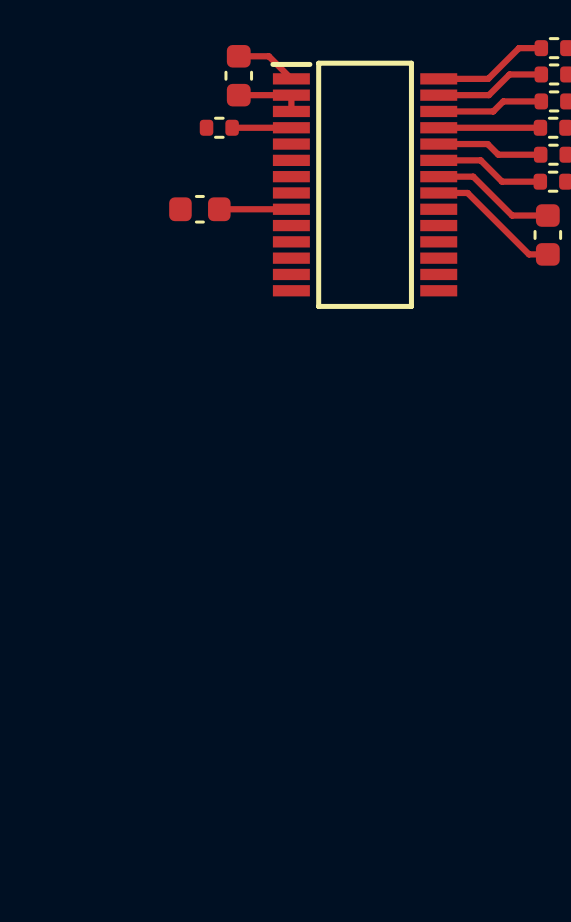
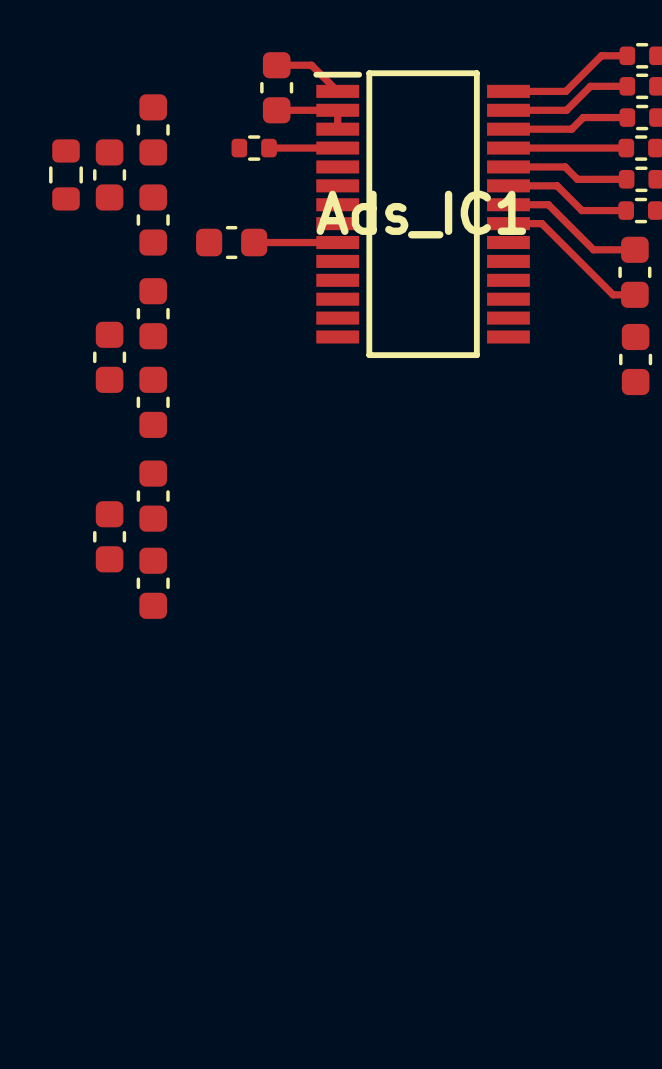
part: none -> (153, 129)
part: none -> (66, 174)
part: none -> (109, 174)
Ads_IC1 name: none -> Ads_IC1 (421, 214)
part: none -> (153, 219)
part: none -> (153, 313)
part: none -> (109, 357)
part: none -> (635, 359)
part: none -> (153, 402)
part: none -> (153, 496)
part: none -> (109, 536)
part: none -> (153, 583)

